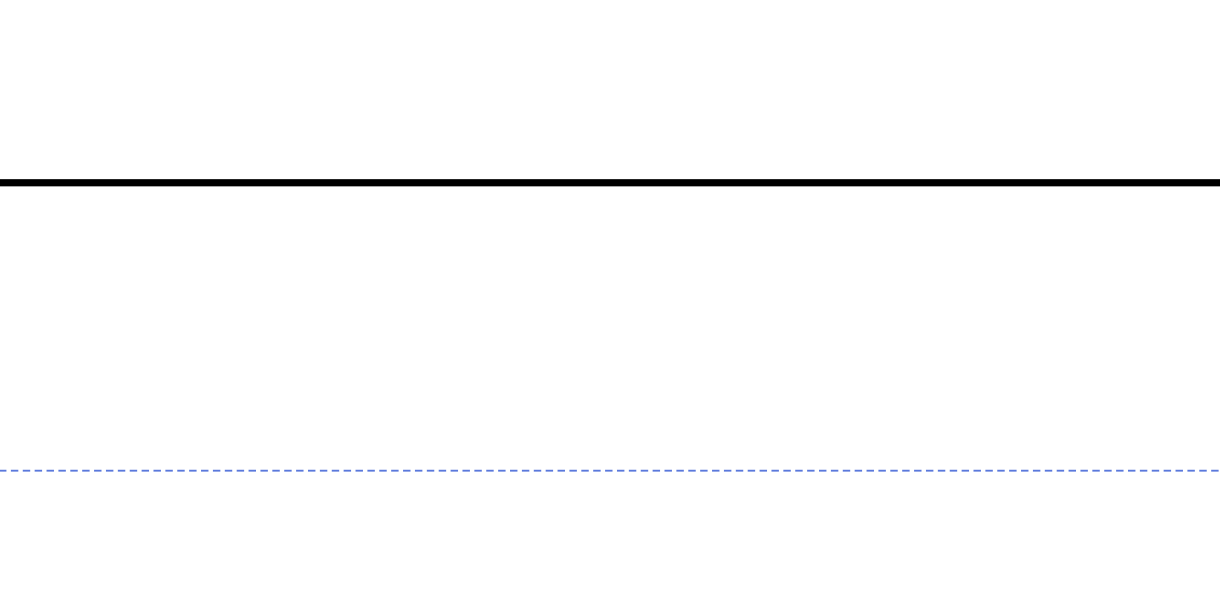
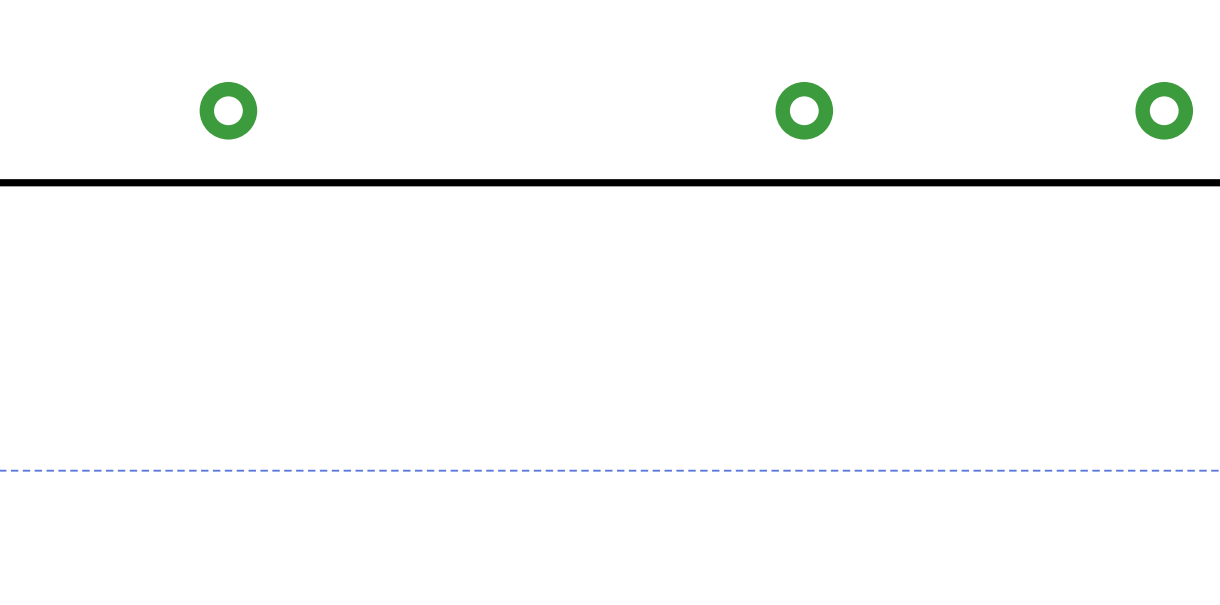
via: none -> (228, 110)
via: none -> (804, 110)
via: none -> (1164, 110)

